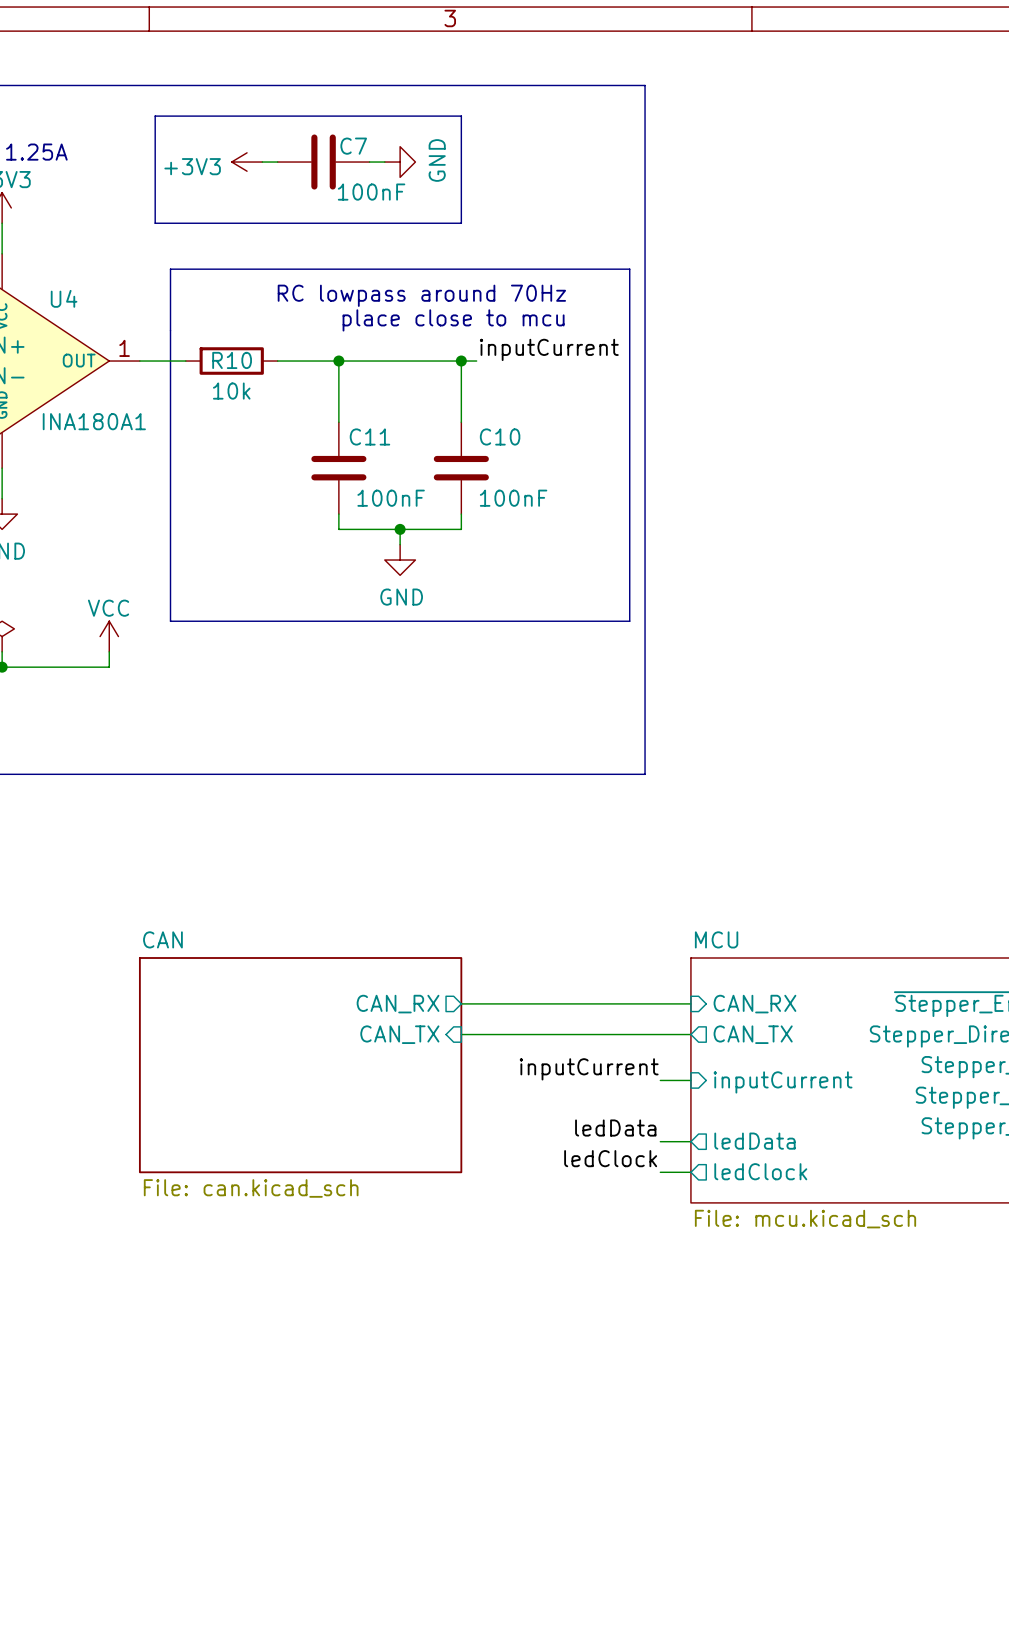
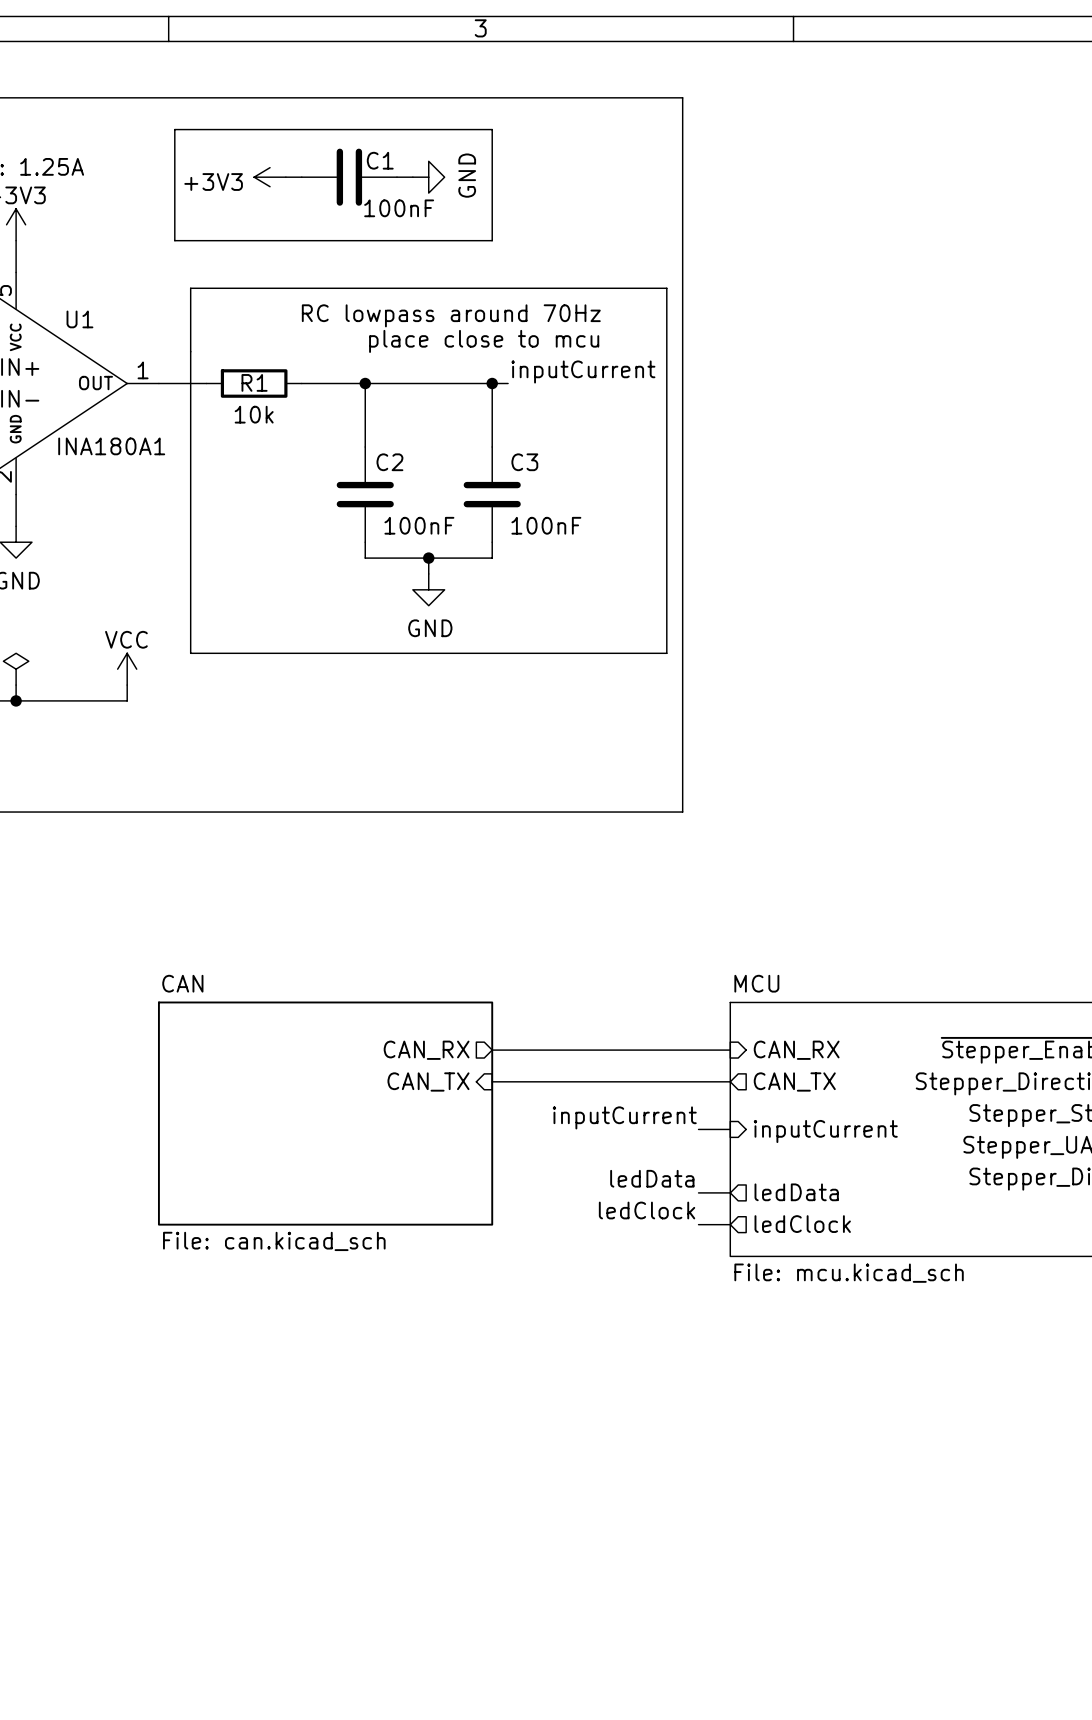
C7 name: C7 (353, 146) -> C1 (380, 160)
U4 name: U4 (64, 298) -> U1 (79, 319)
R10 name: R10 (232, 360) -> R1 (254, 382)
C11 name: C11 (369, 436) -> C2 (389, 462)
C10 name: C10 (500, 436) -> C3 (524, 462)

